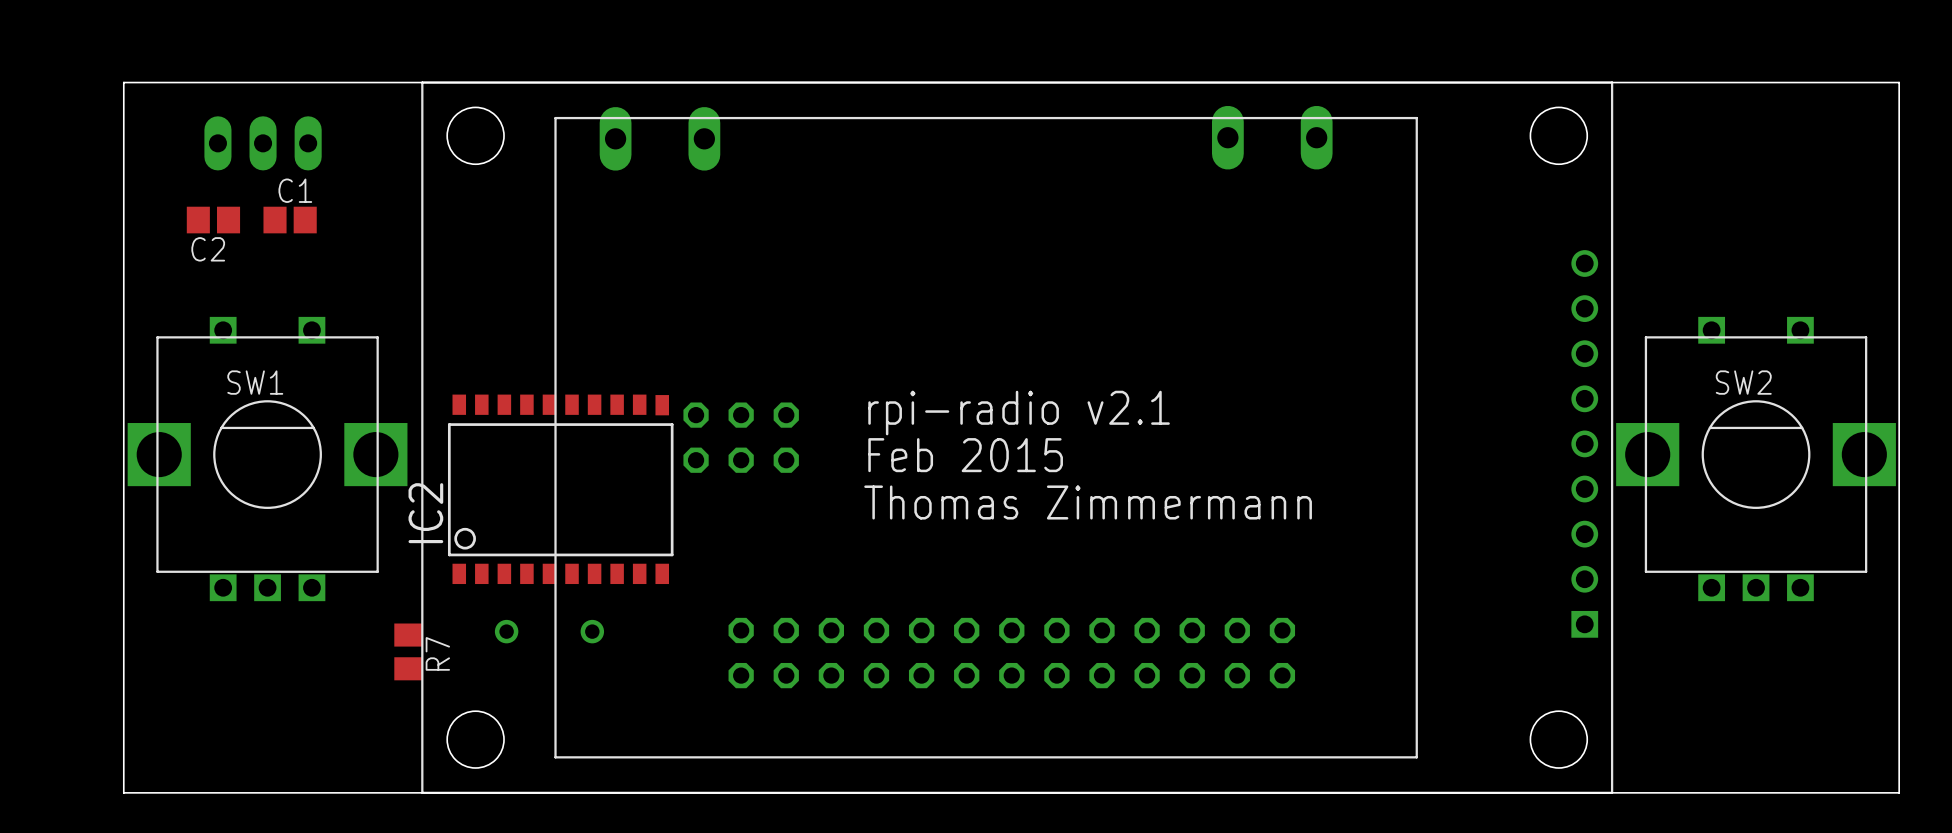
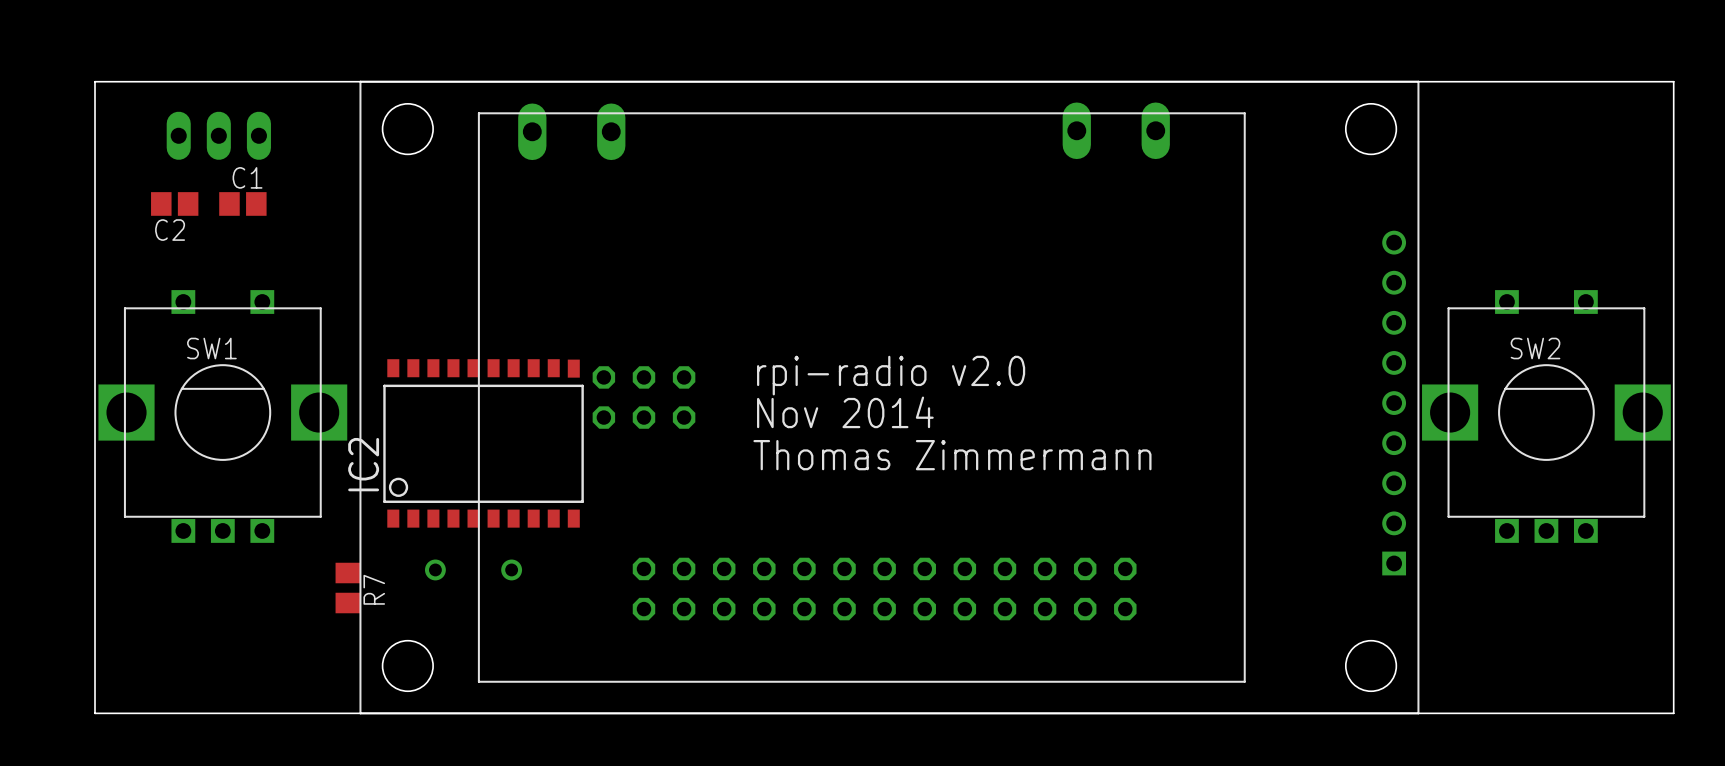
text: rpi-radio v2.1 (1019, 413) -> rpi-radio v2.0 (891, 375)
text: Feb 2015 (965, 455) -> Nov 2014 (845, 412)

